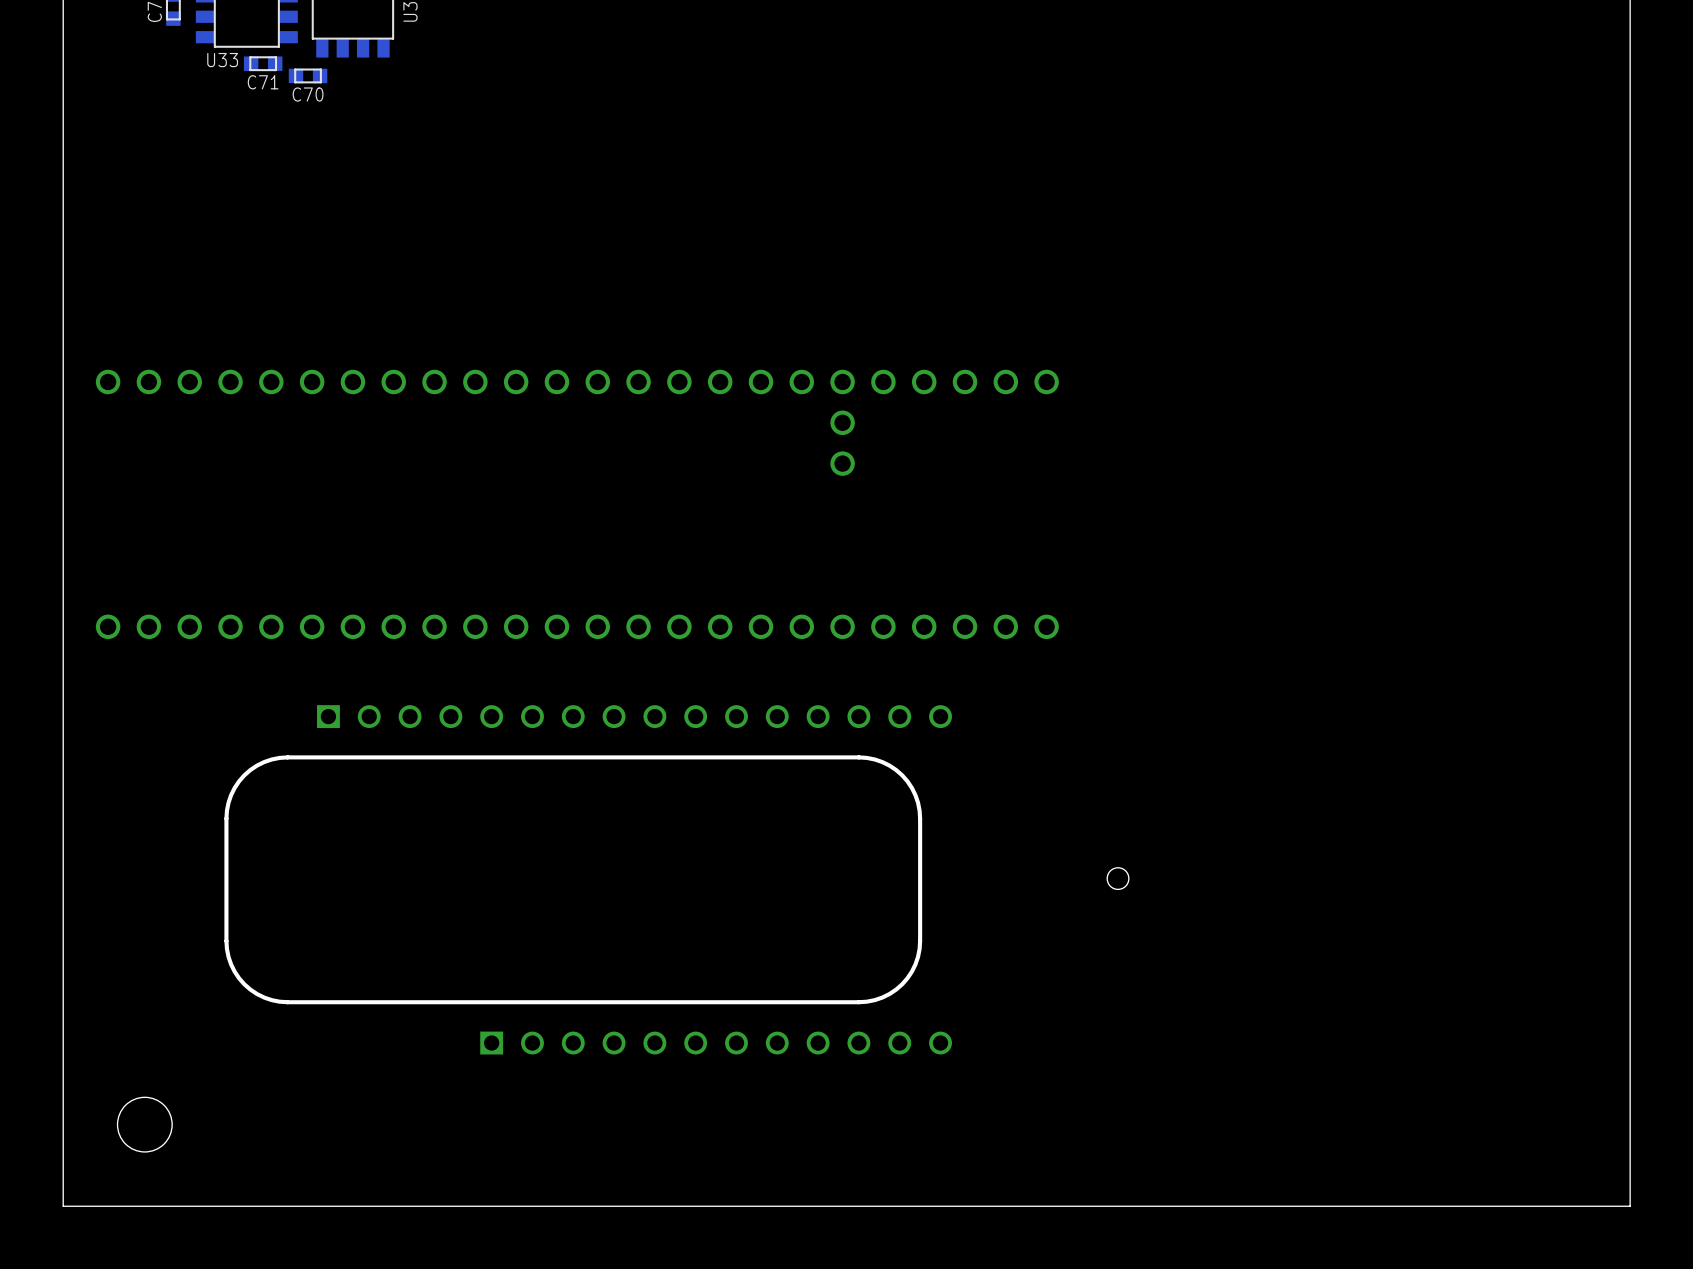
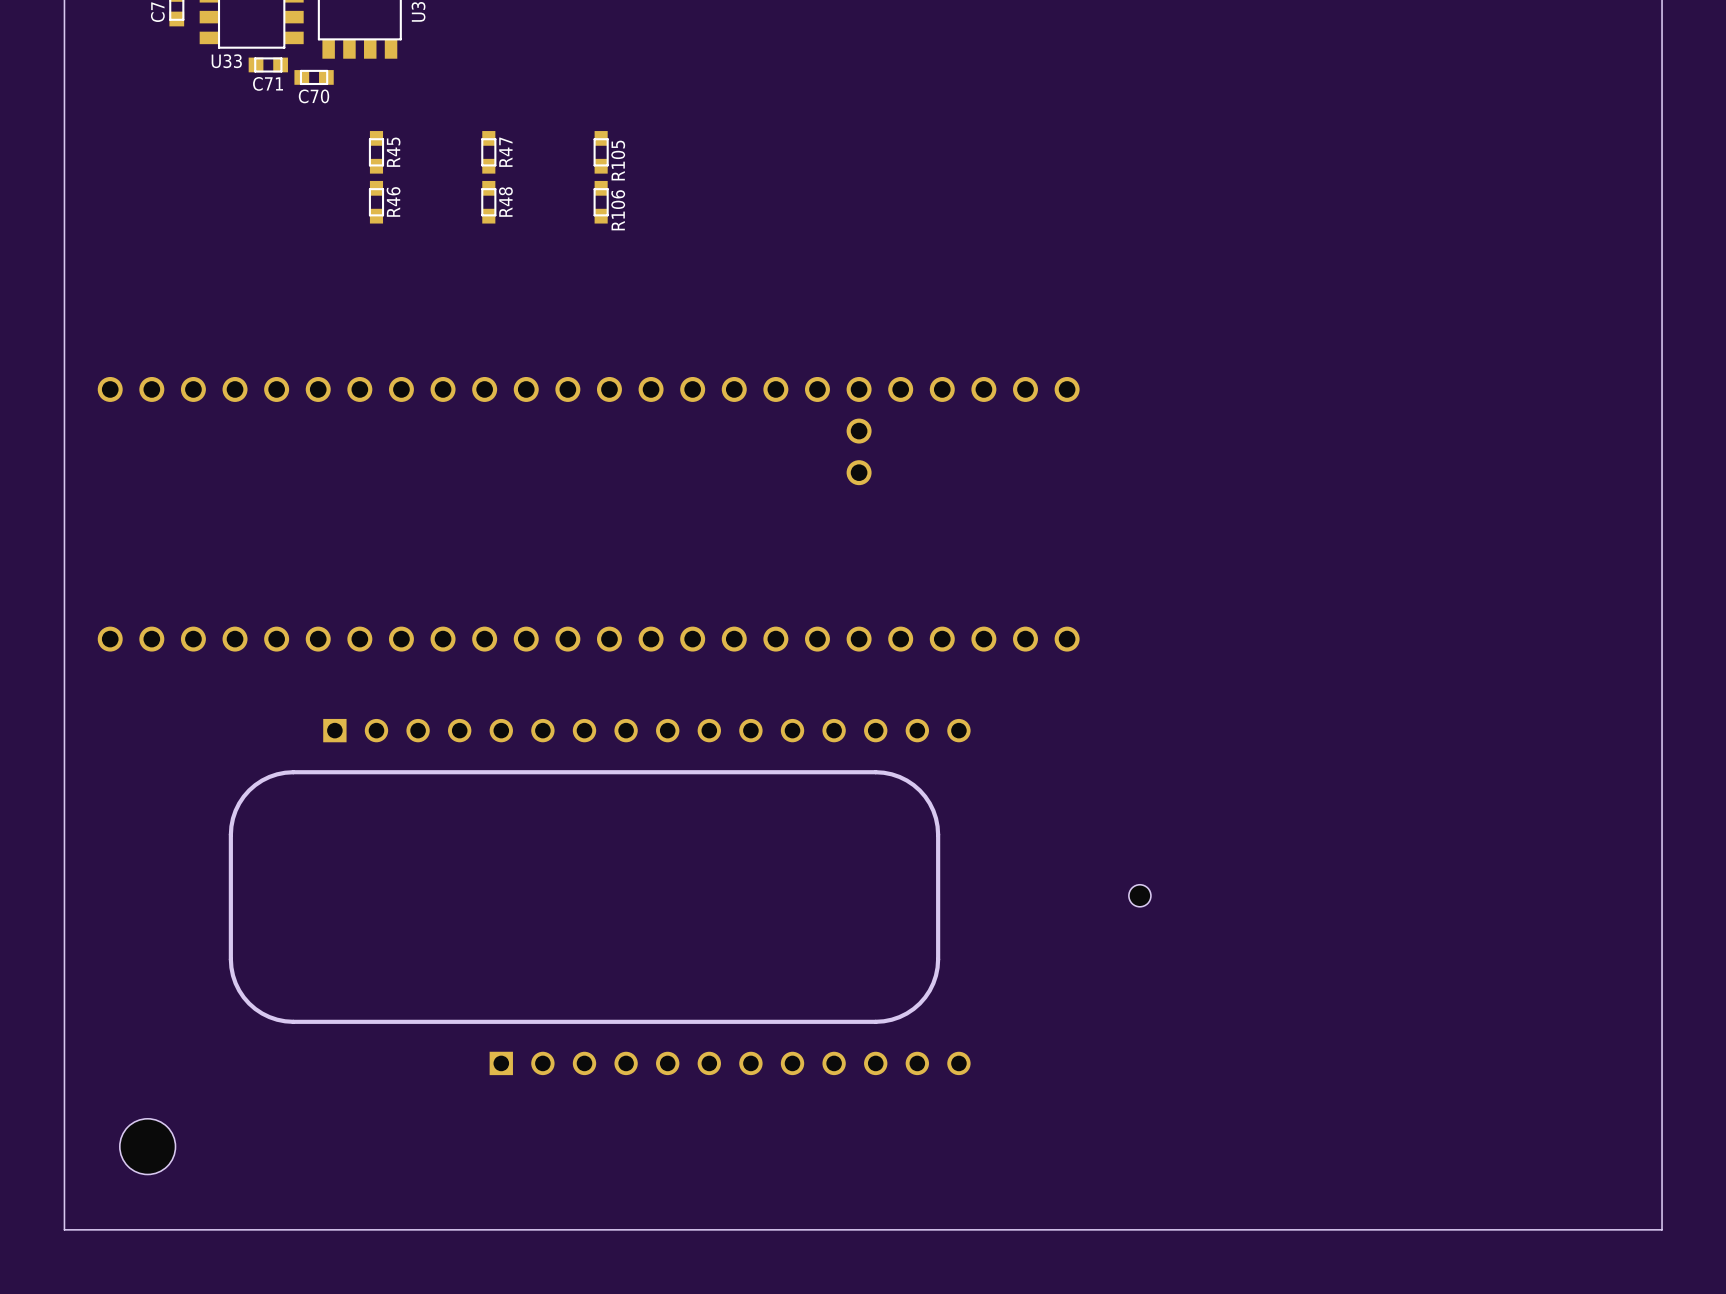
R45: none -> (376, 152)
R47: none -> (488, 152)
R105: none -> (601, 152)
R46: none -> (376, 202)
R48: none -> (488, 202)
R106: none -> (601, 202)

